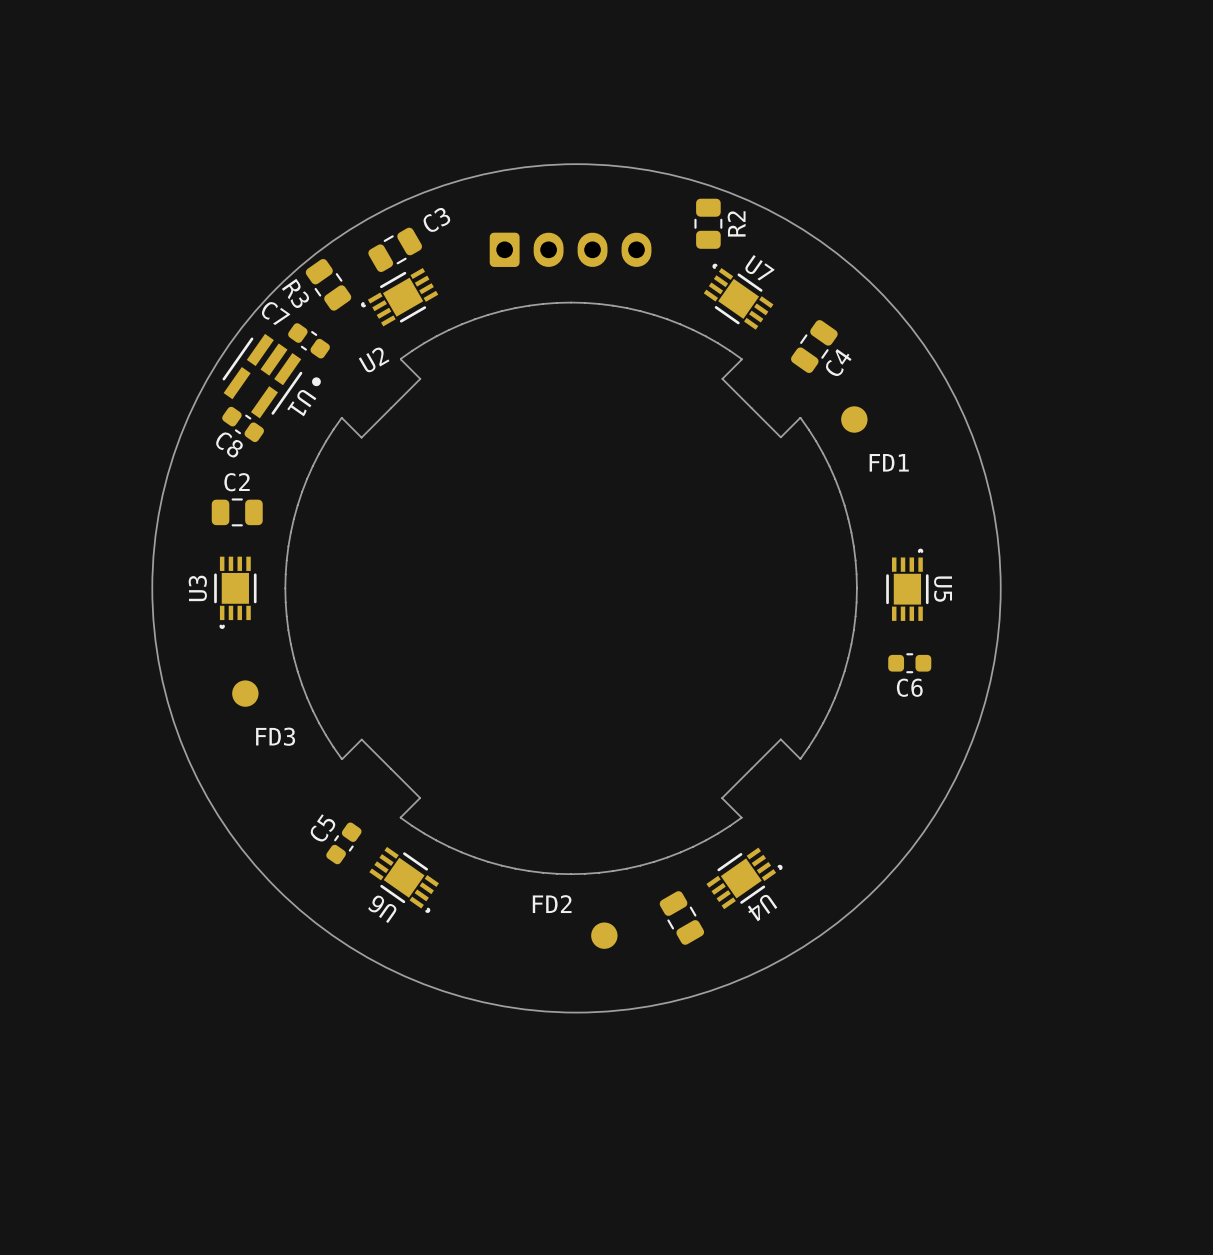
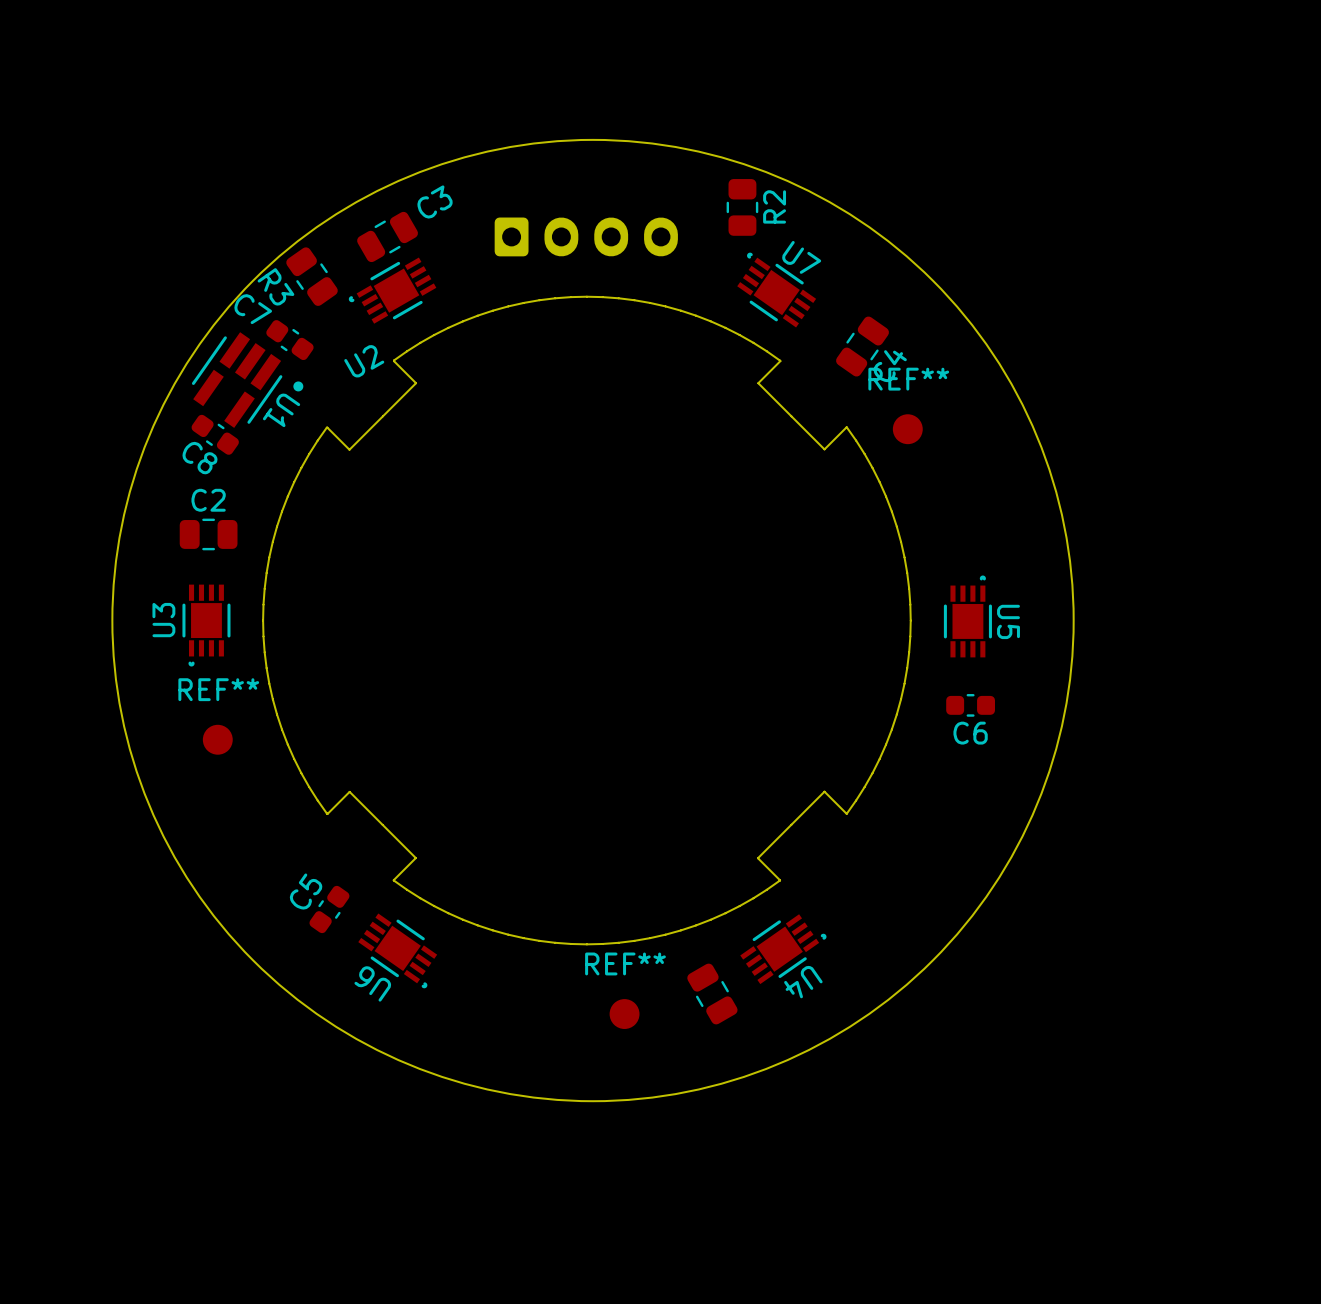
FD1 name: FD1 (889, 462) -> REF** (908, 379)
FD3 name: FD3 (275, 736) -> REF** (218, 689)
FD2 name: FD2 (552, 904) -> REF** (625, 963)

